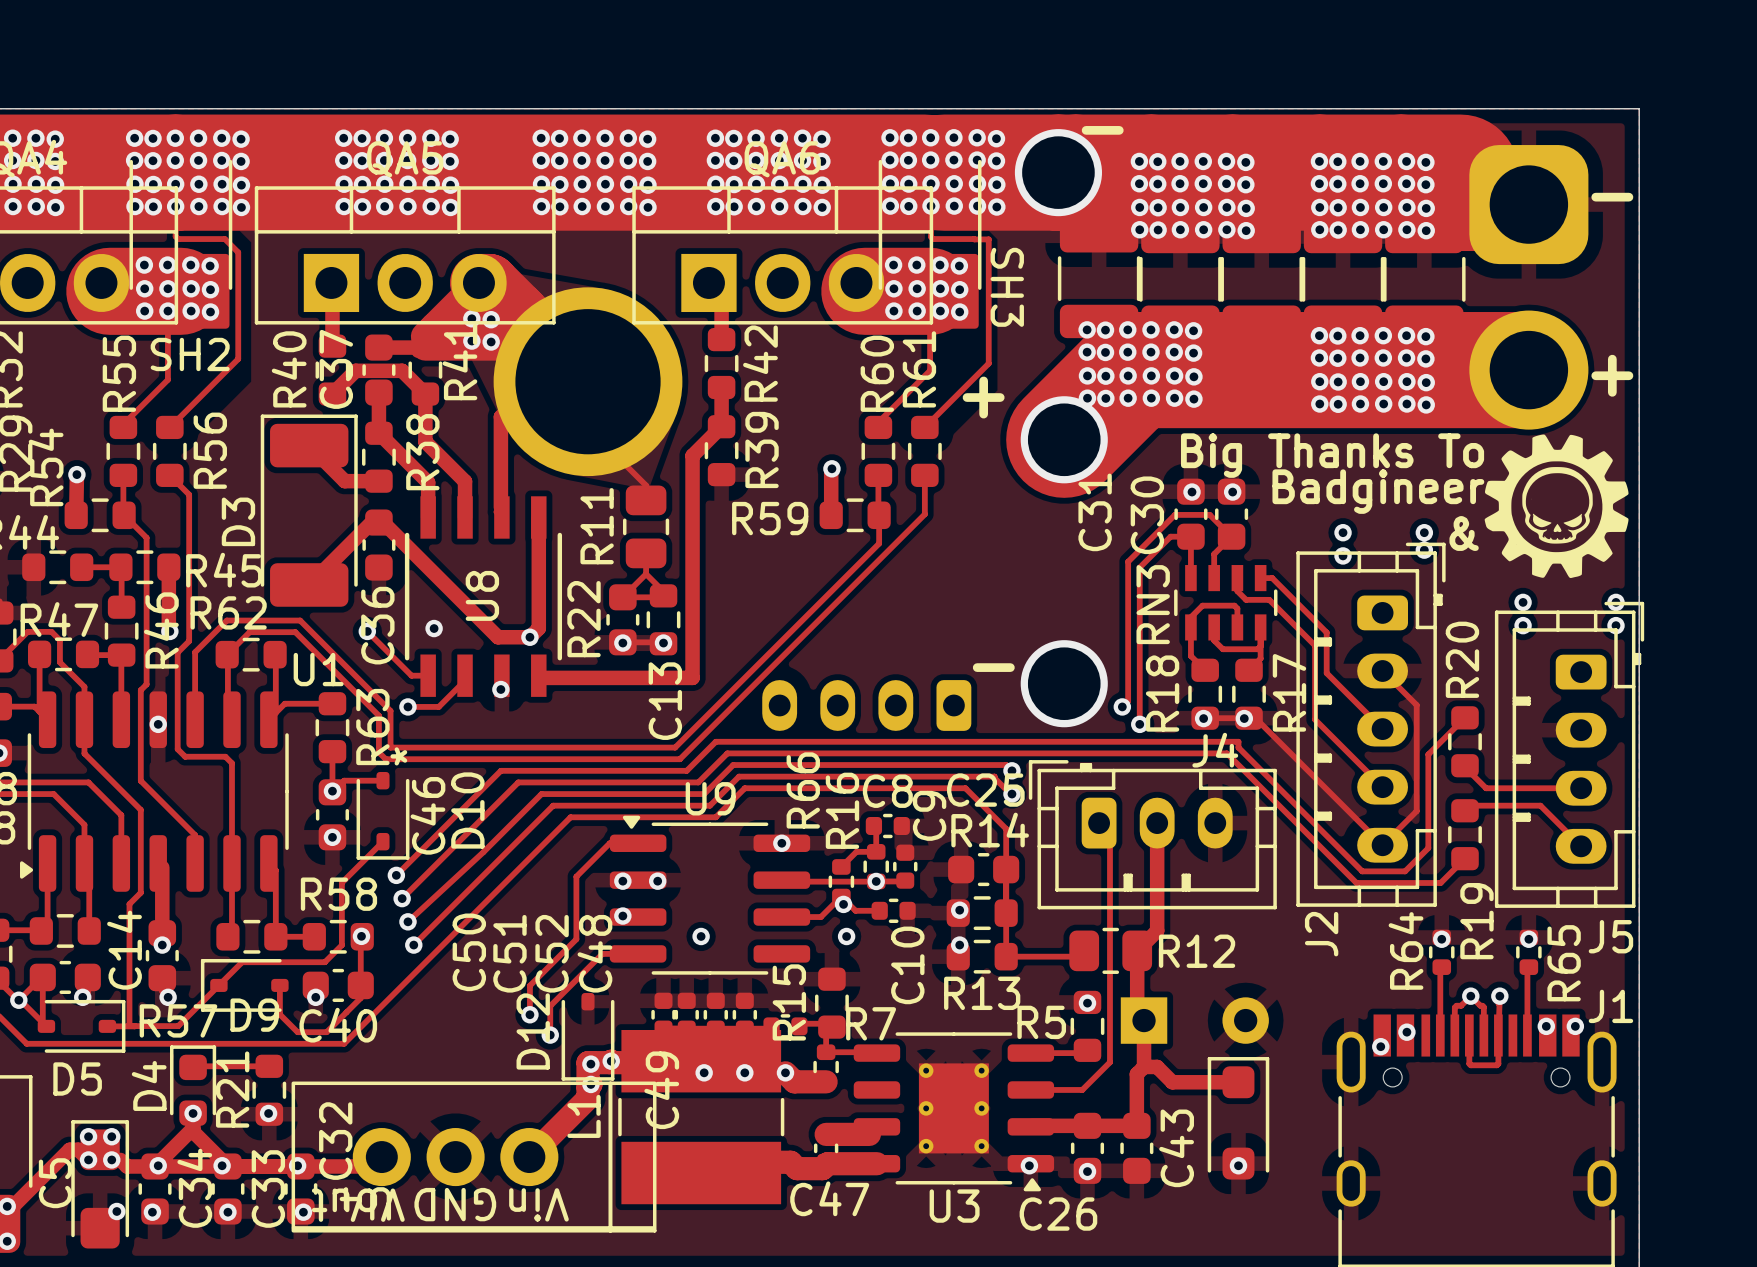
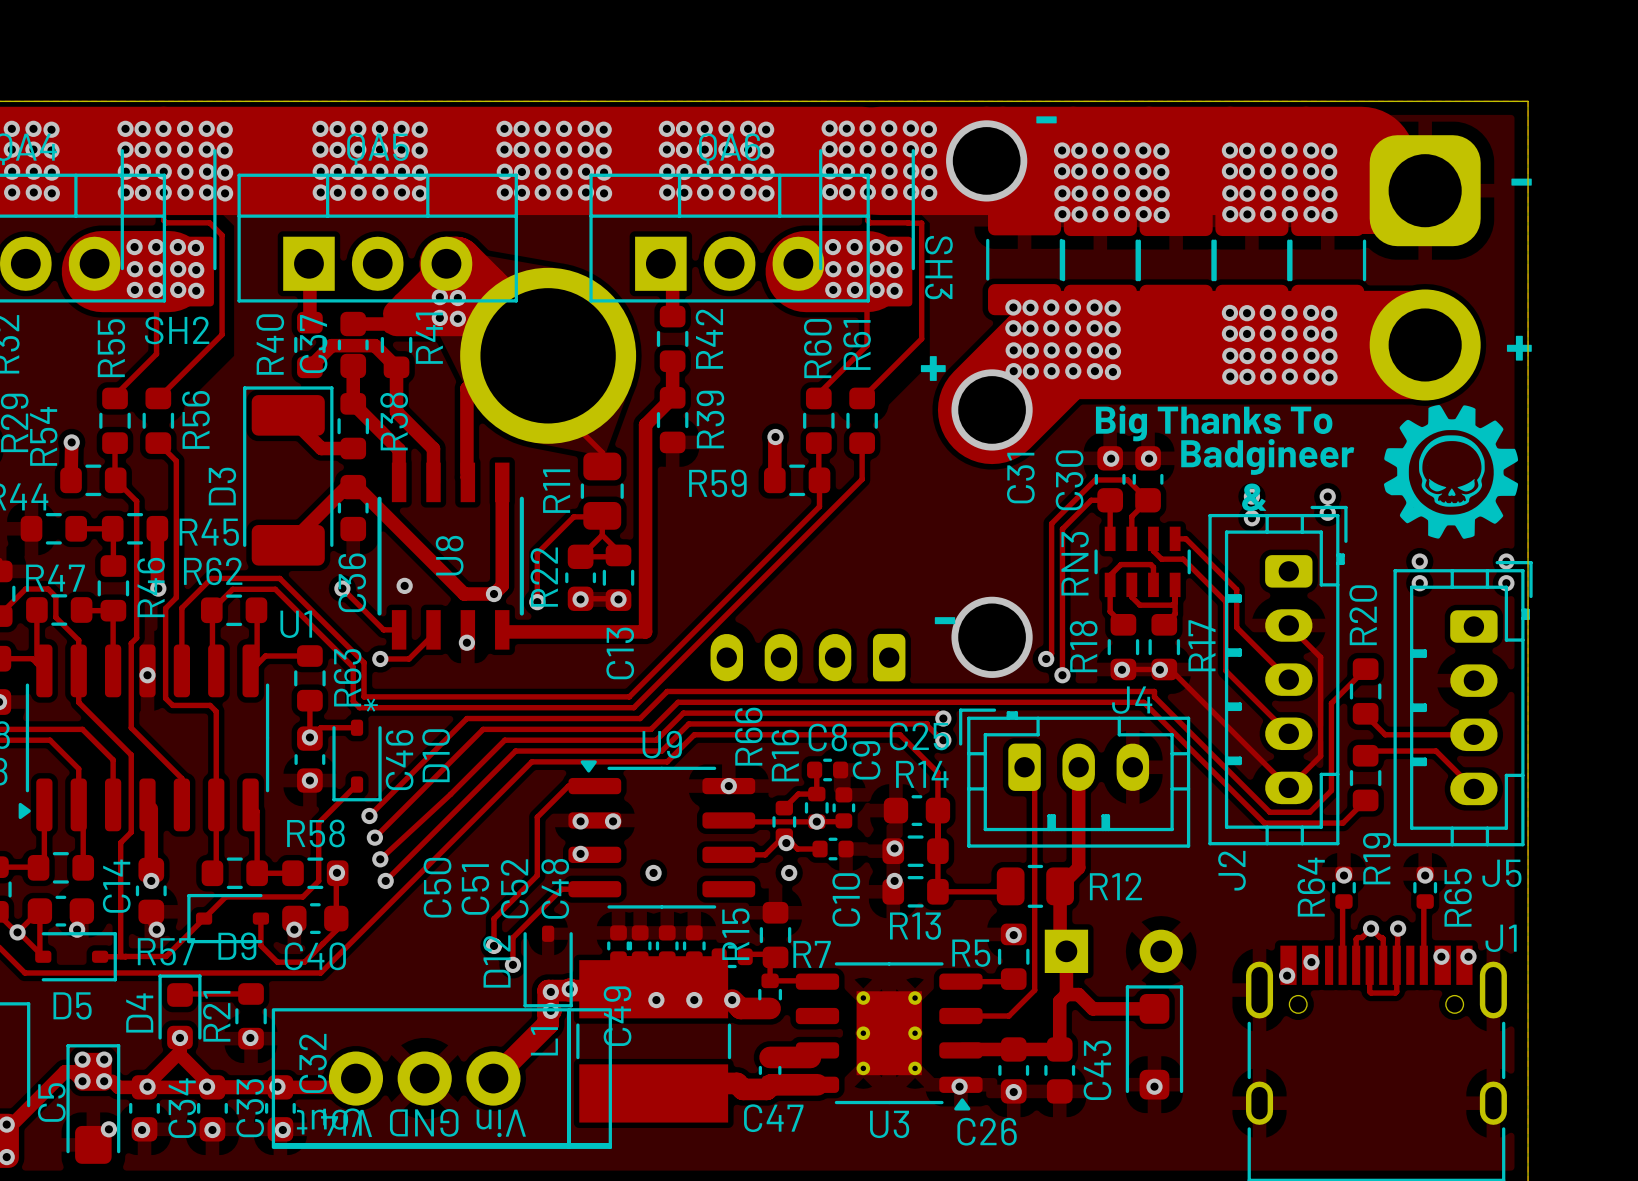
track: none -> (594, 508) (585, 516) (573, 516) (537, 553) (537, 602)
via: none -> (537, 602)

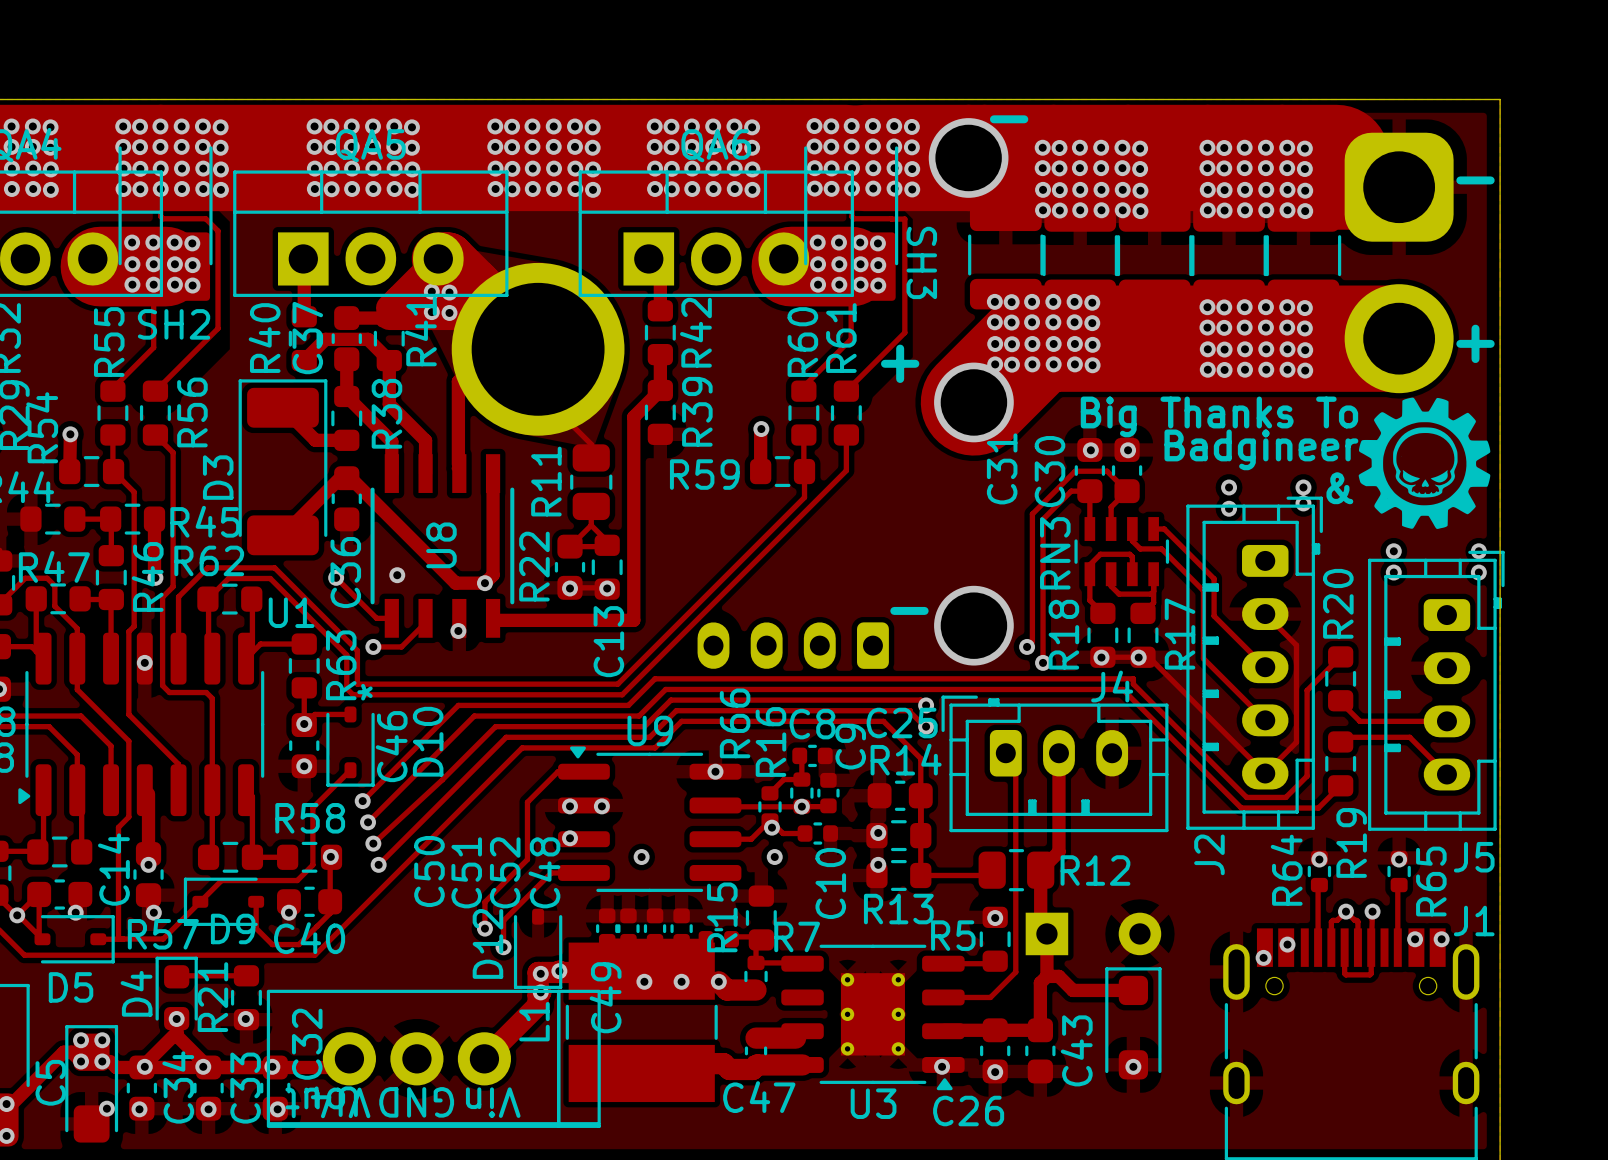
track: (594, 508) (585, 516) (573, 516) (537, 553) (537, 602) -> none
via: (537, 602) -> none

